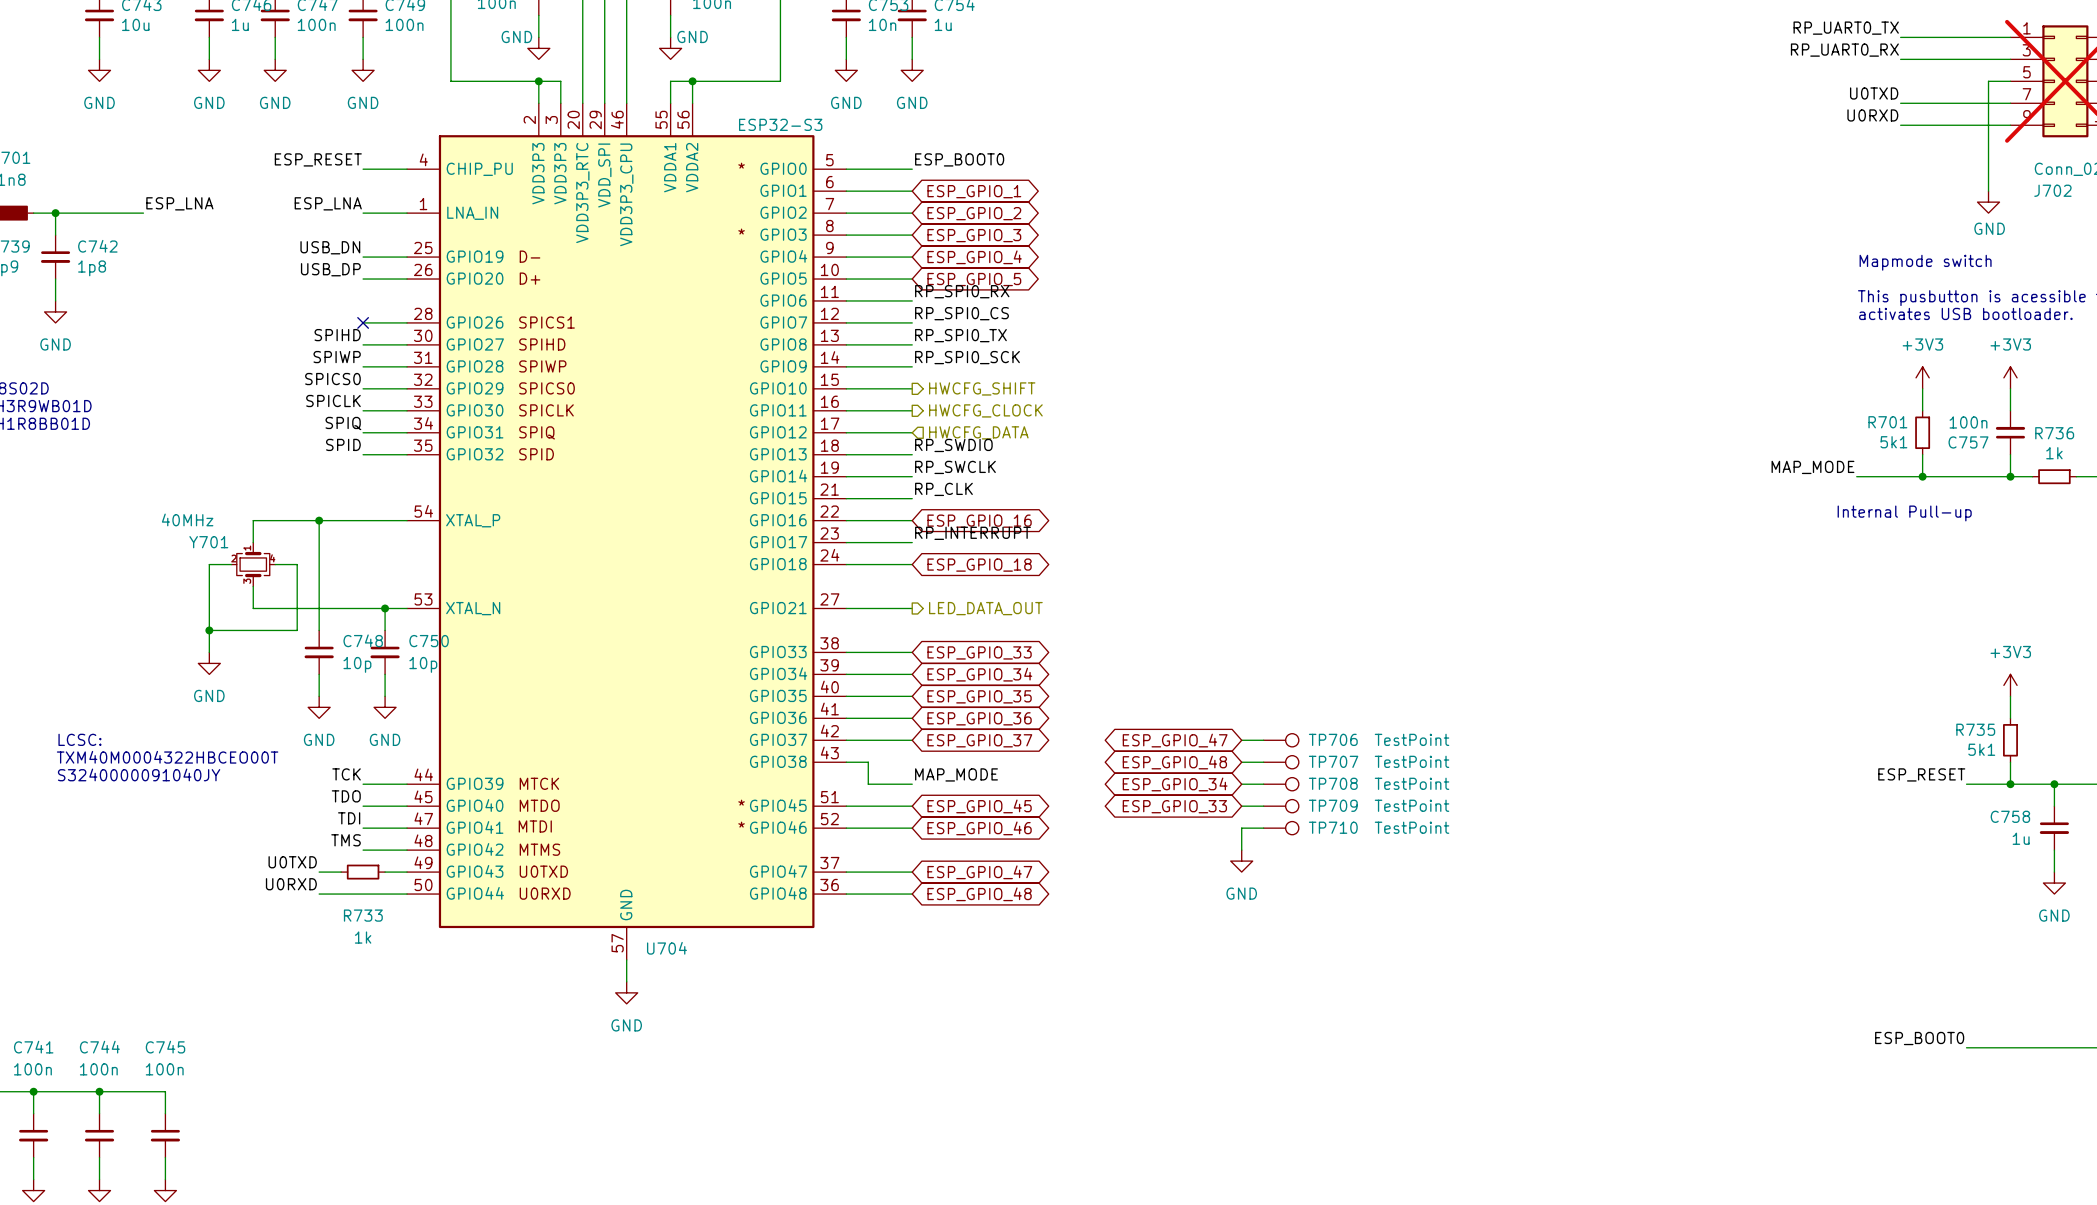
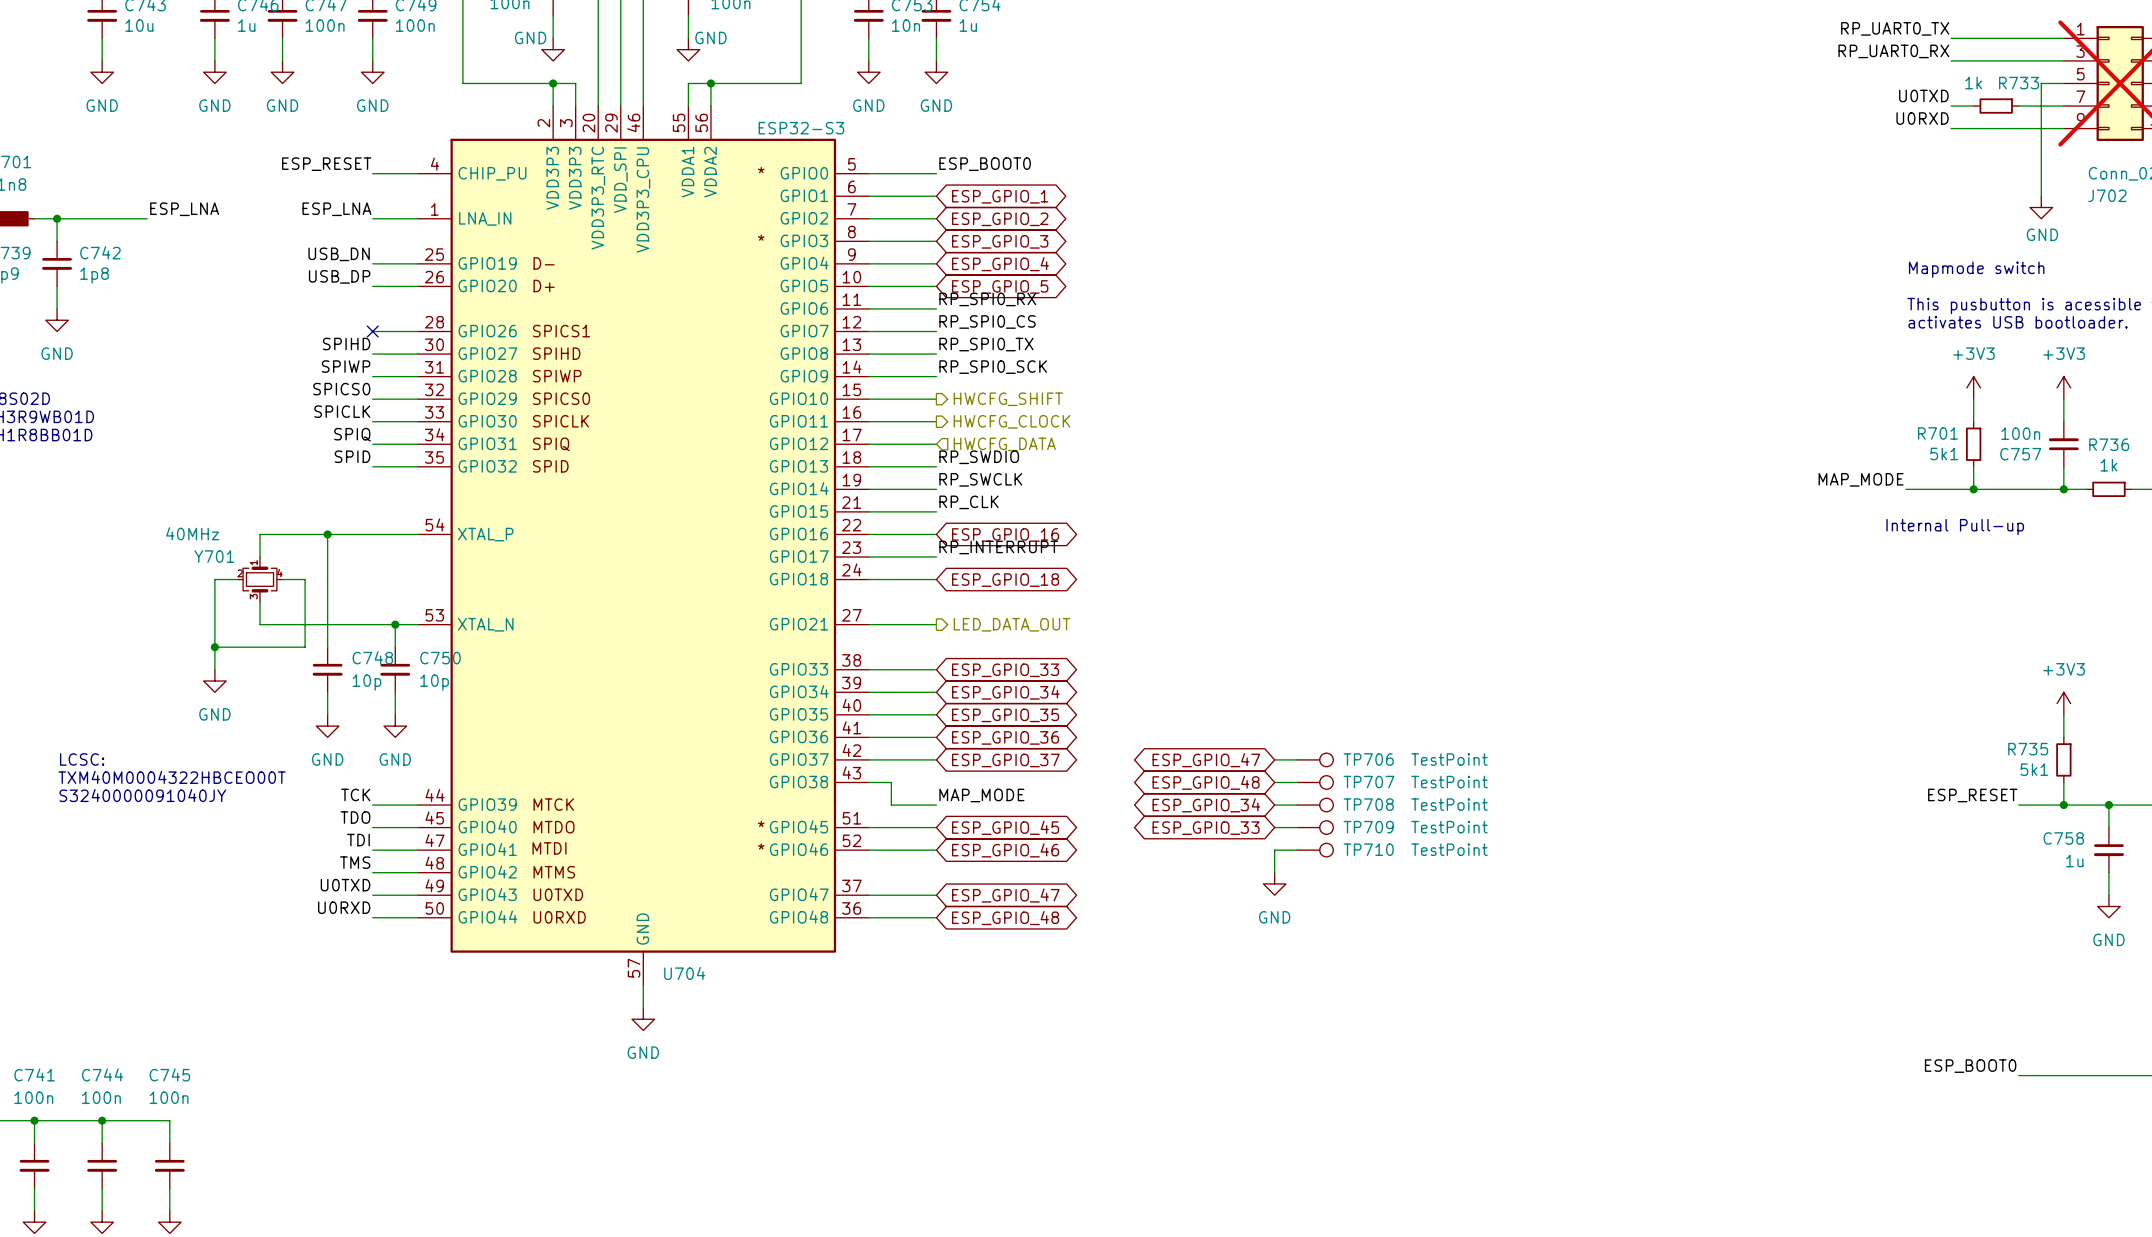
wire: (1922, 103) (1966, 103) -> none
label position: U0TXD (292, 862) -> U0TXD (345, 885)
wire: (319, 872) (341, 872) -> (372, 895) (395, 895)
R733 position: (363, 872) -> (1996, 106)
label position: U0RXD (291, 884) -> U0RXD (344, 907)
wire: (319, 894) (363, 894) -> none
R733 name position: R733 (363, 915) -> R733 (2019, 83)
R733 value position: 1k (363, 937) -> 1k (1973, 83)

